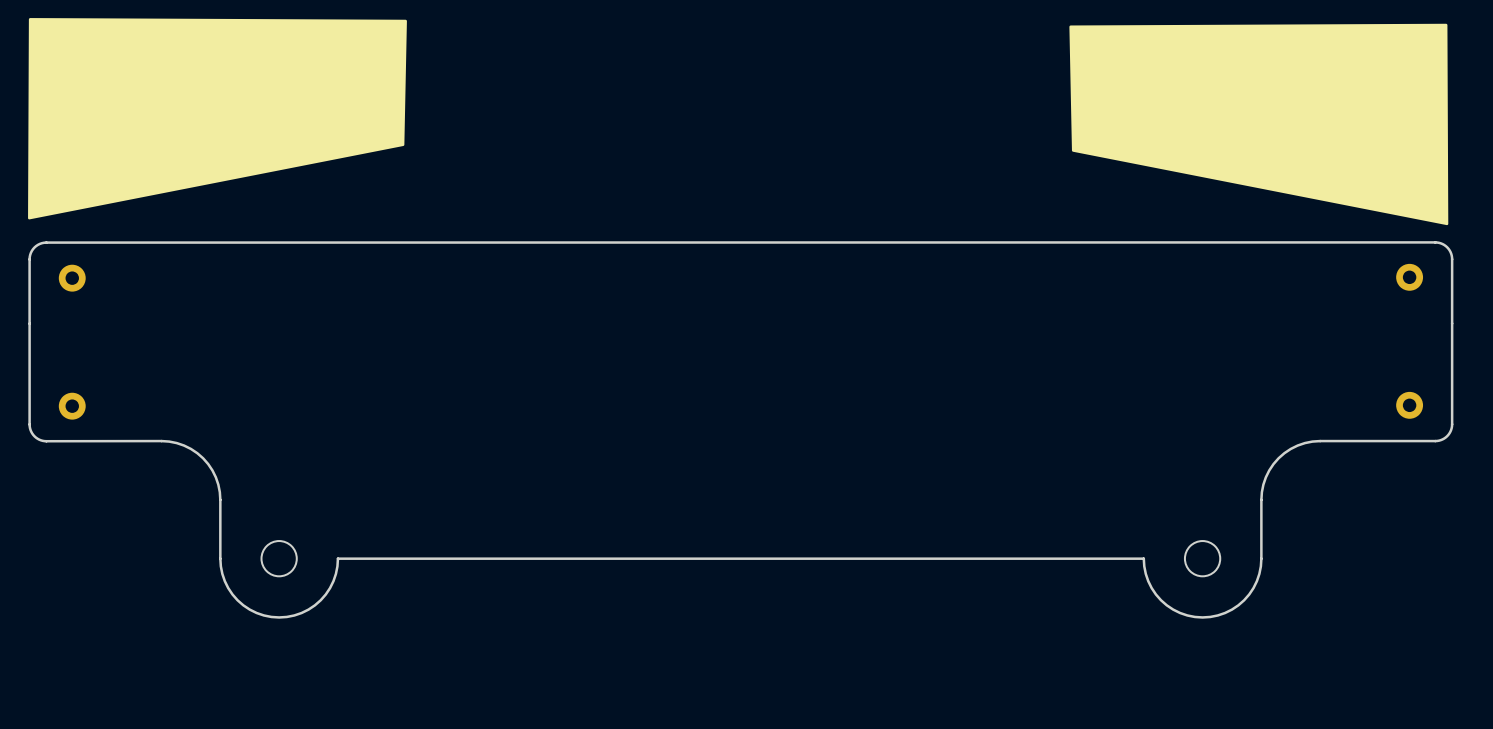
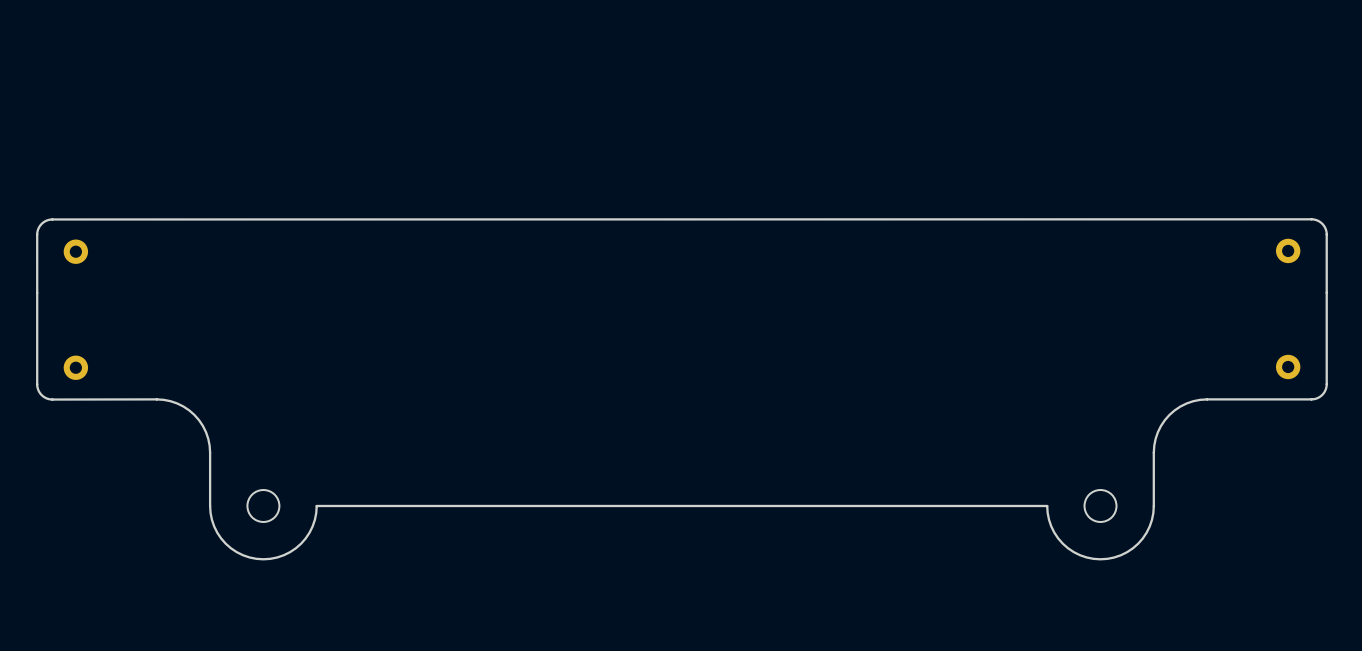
drawing: [28, 18, 407, 220] -> none
drawing: [1069, 23, 1449, 226] -> none

